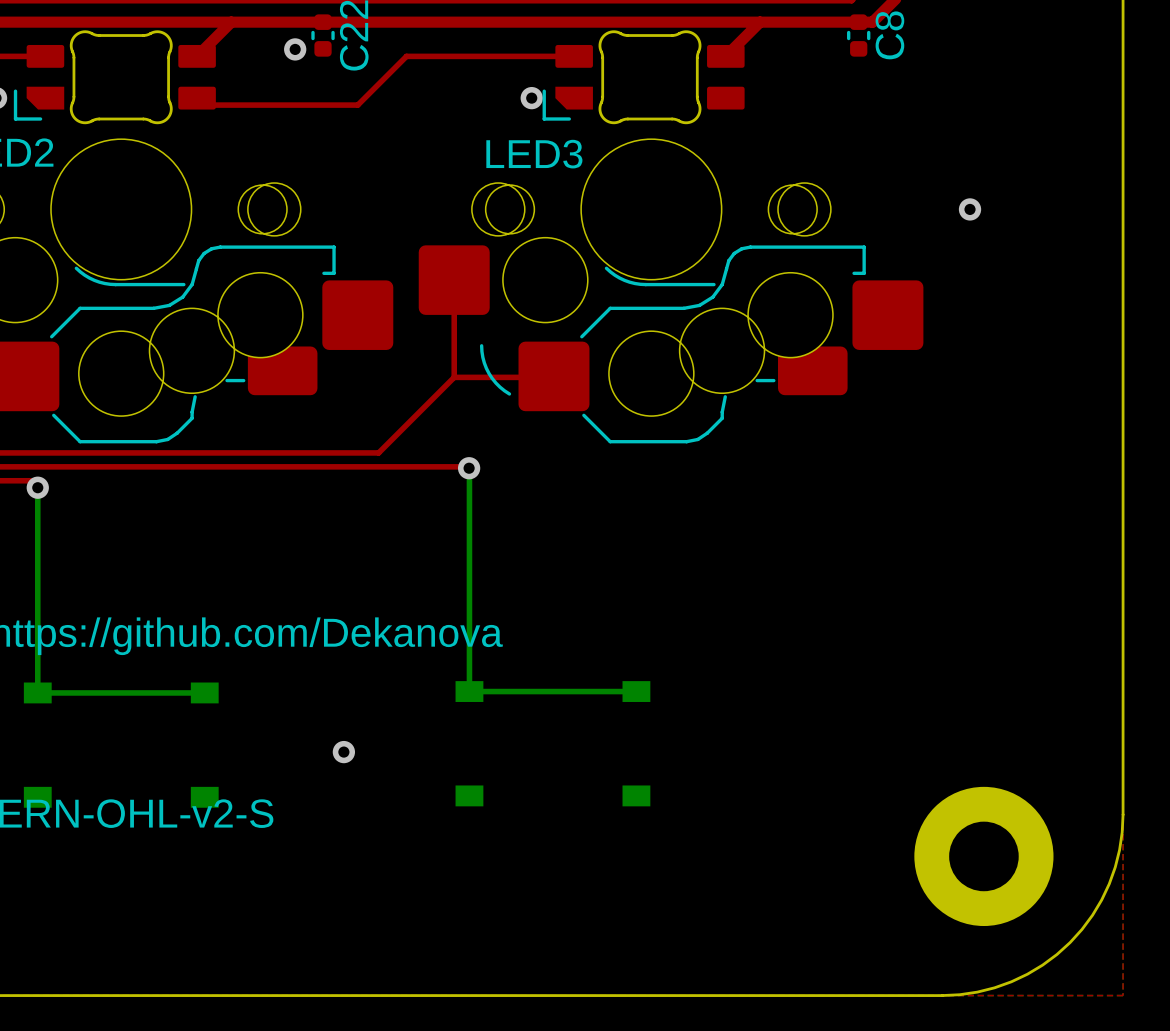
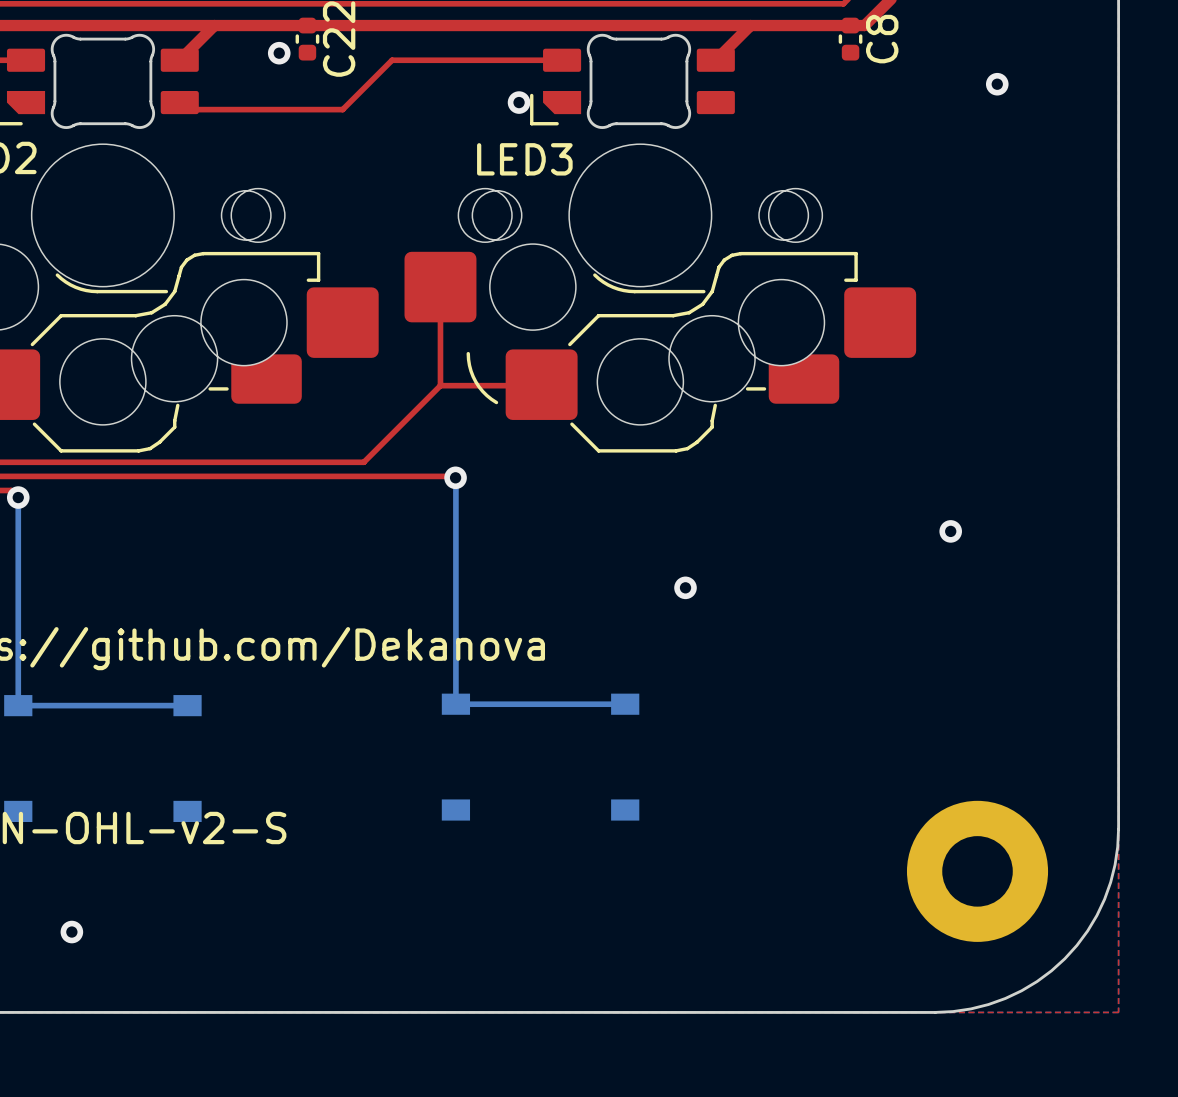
via: none -> (997, 84)
via: (970, 209) -> none
via: none -> (950, 531)
via: none -> (685, 587)
via: (343, 752) -> none
via: none -> (71, 932)

